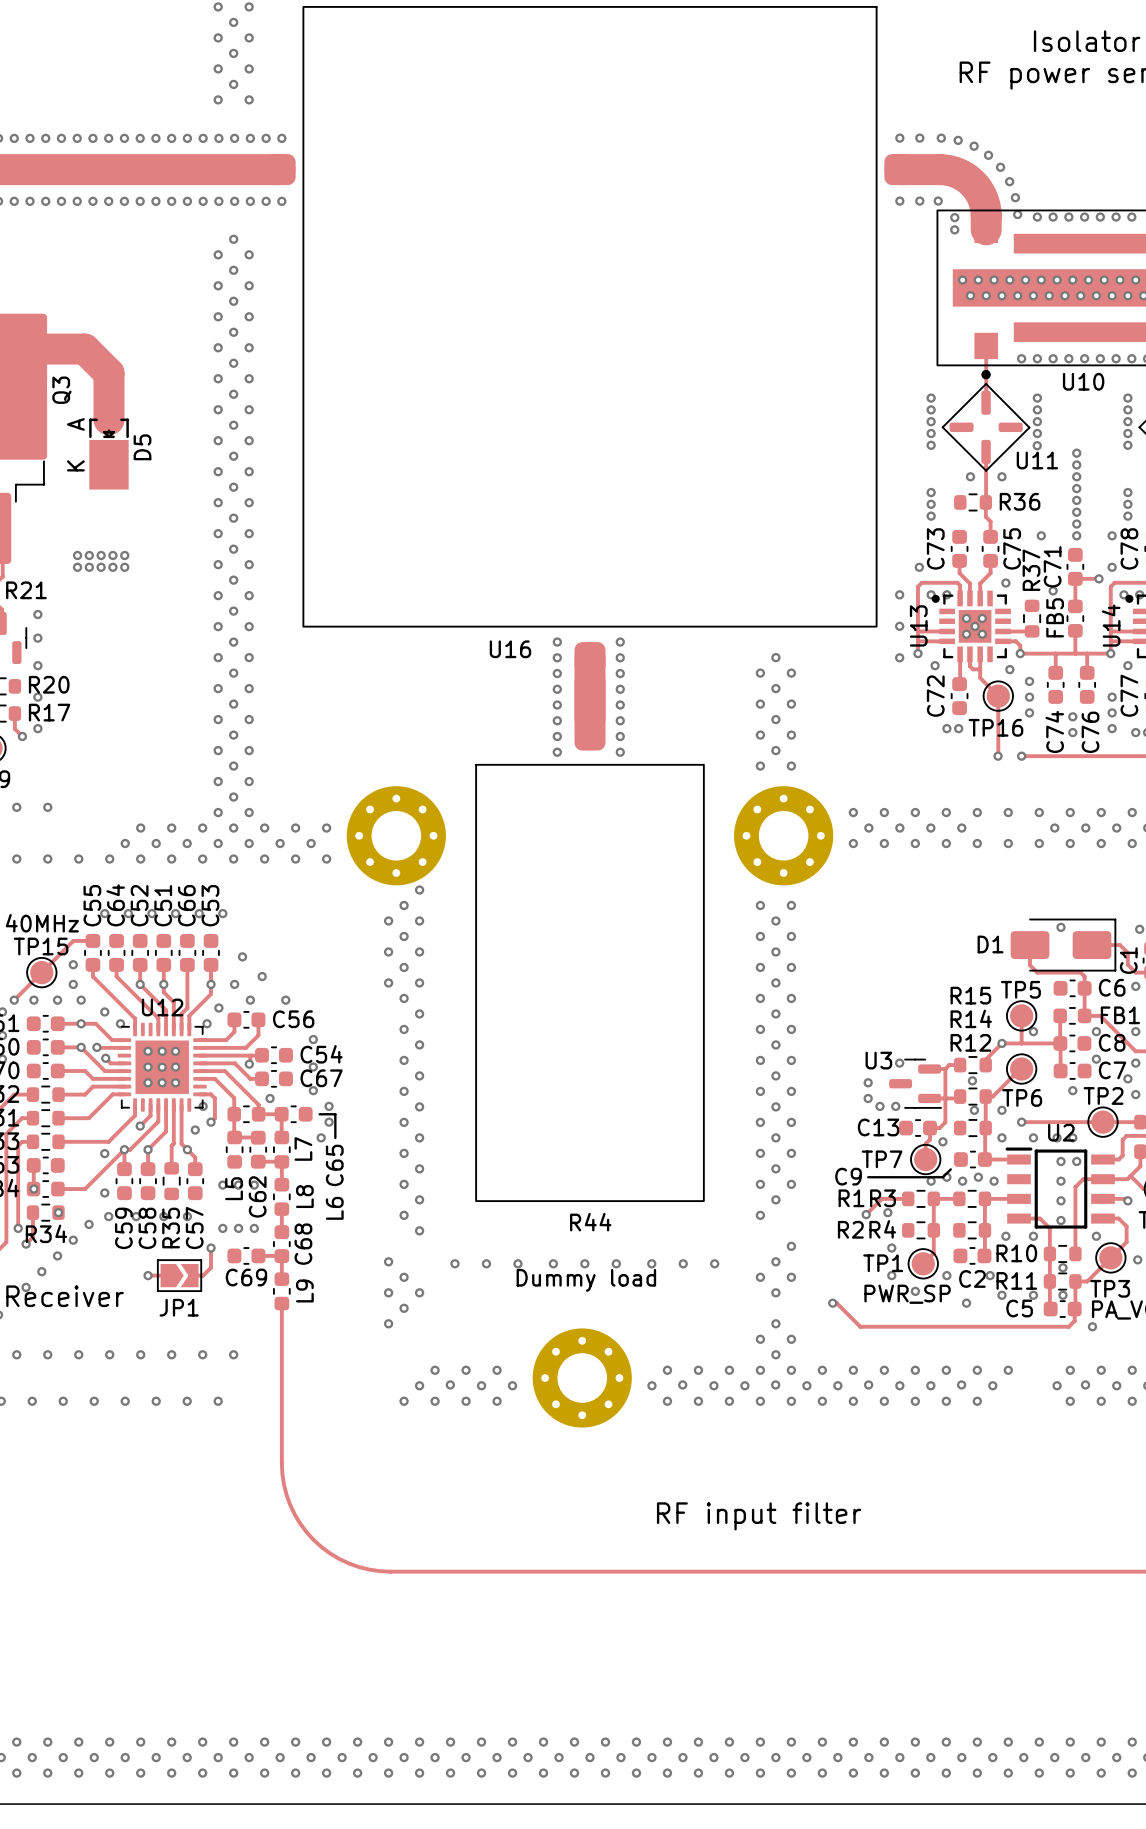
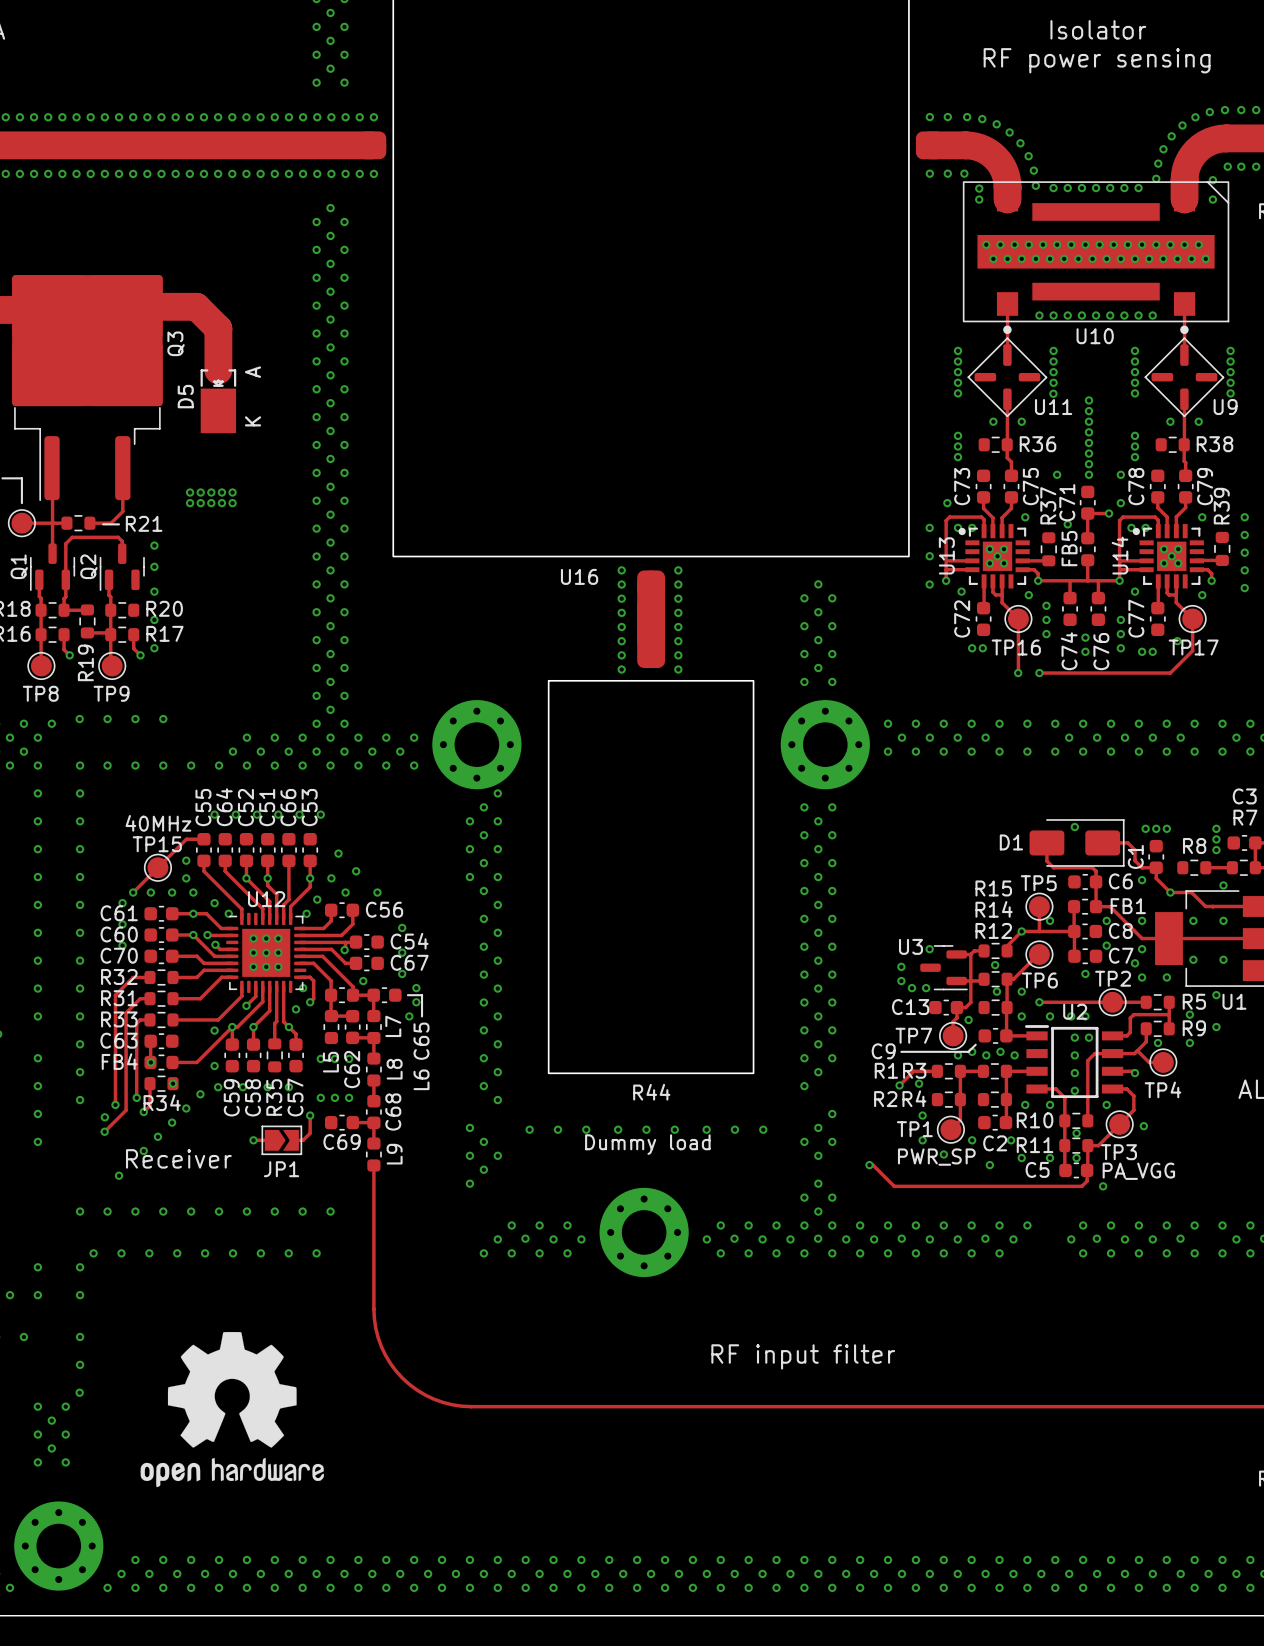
D5 text position: A (75, 424) -> A (253, 372)
D5 name position: D5 (142, 447) -> D5 (185, 396)
D5 text position: K (75, 465) -> K (253, 421)
drawing: none -> [140, 1331, 324, 1488]

